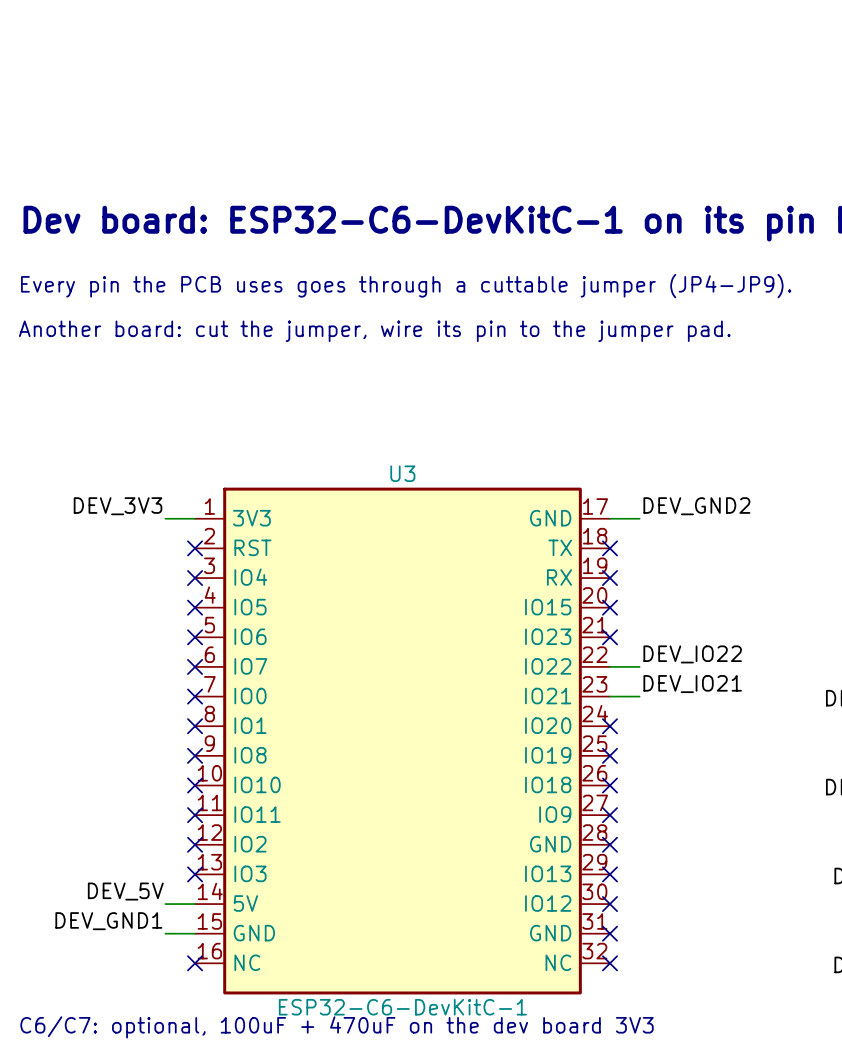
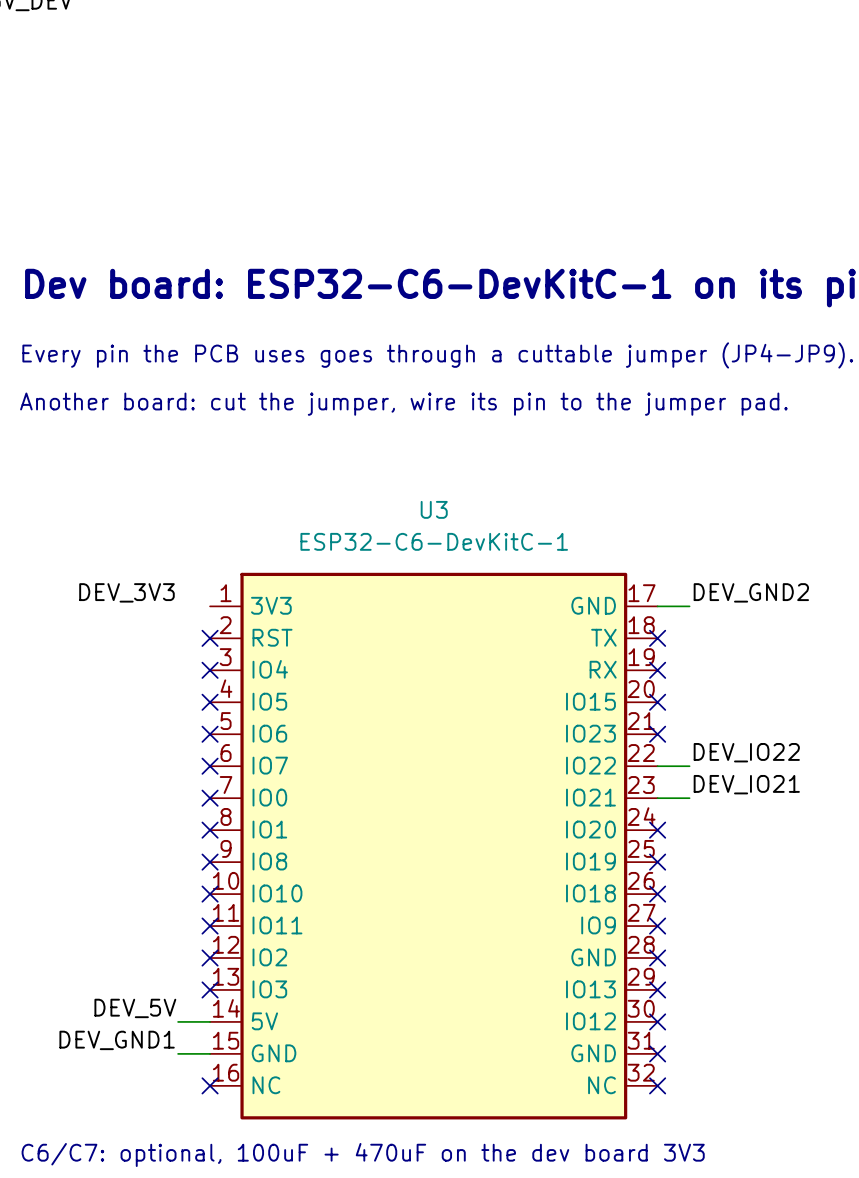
U3 name position: U3 (402, 473) -> U3 (434, 509)
wire: (165, 518) (195, 518) -> none
U3 value position: ESP32-C6-DevKitC-1 (402, 1007) -> ESP32-C6-DevKitC-1 (434, 541)

